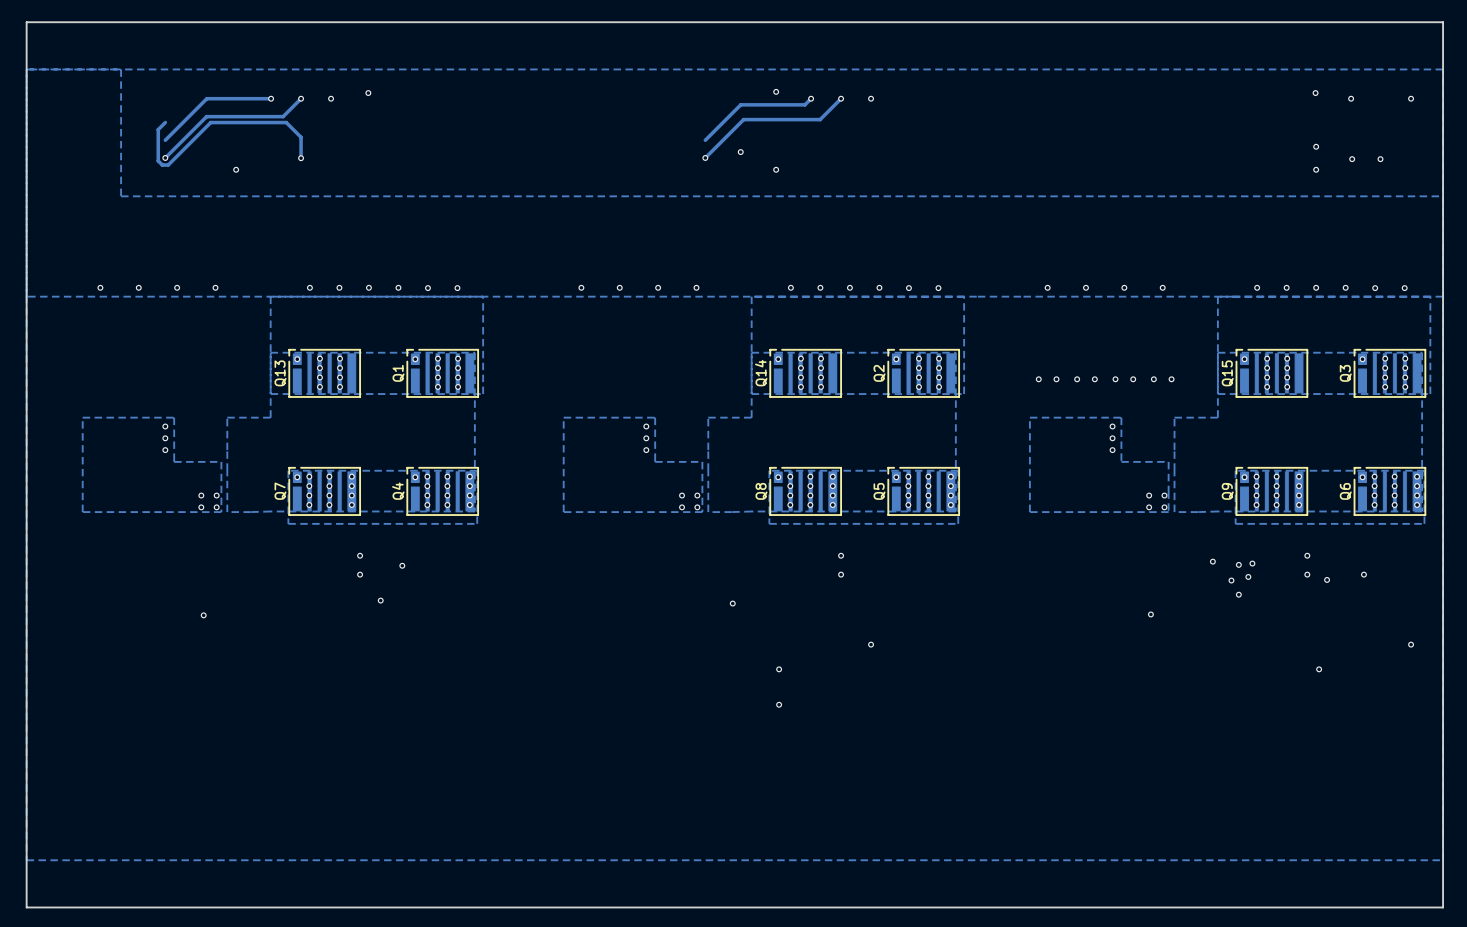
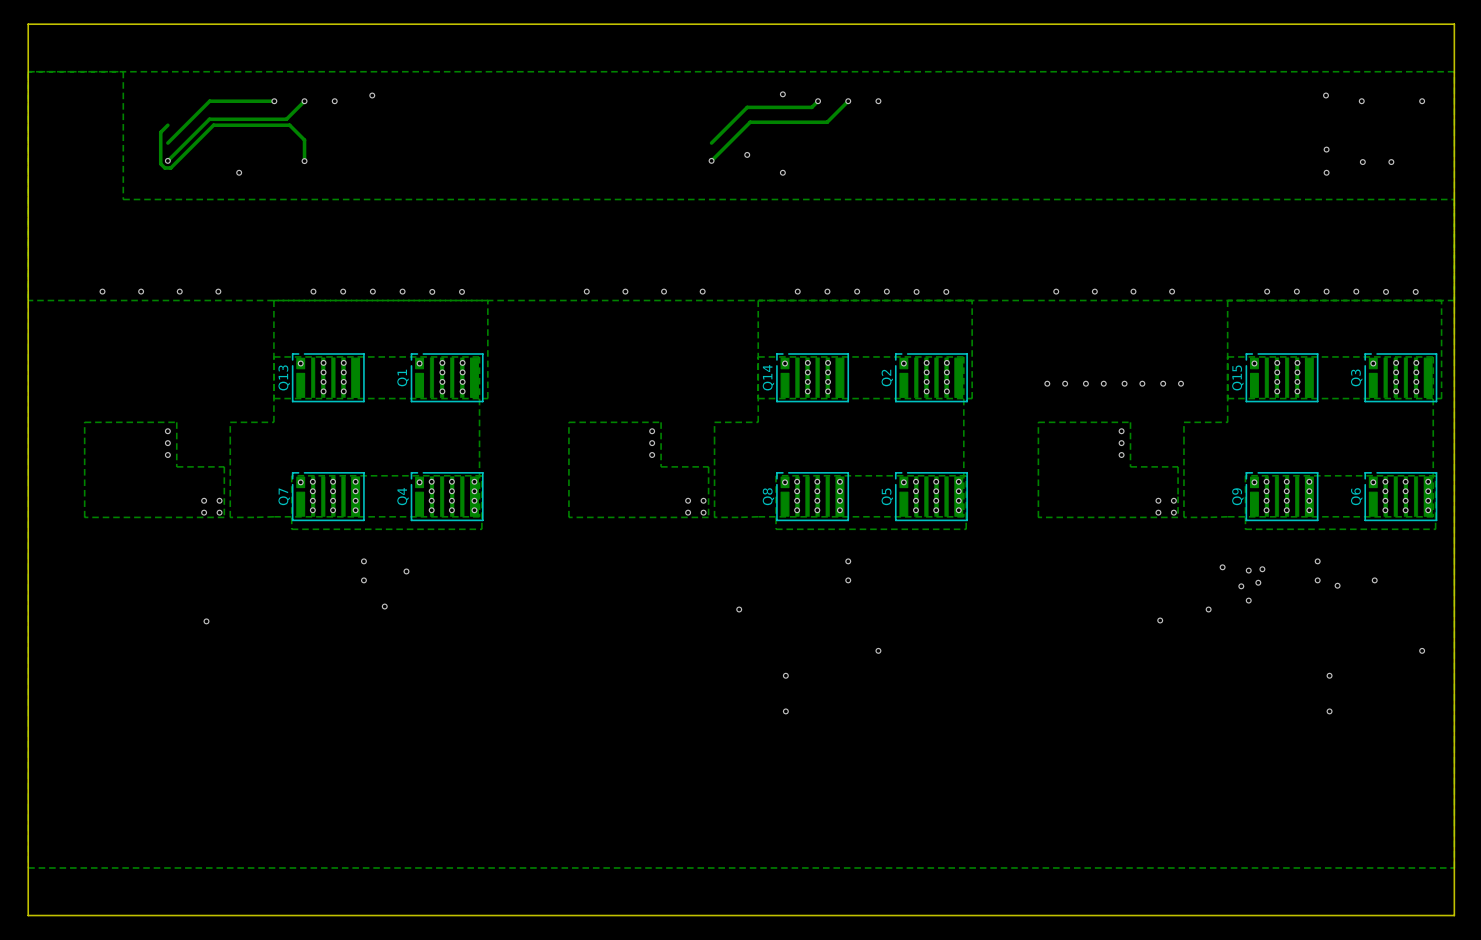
via: none -> (1208, 609)
via: none -> (1329, 711)

